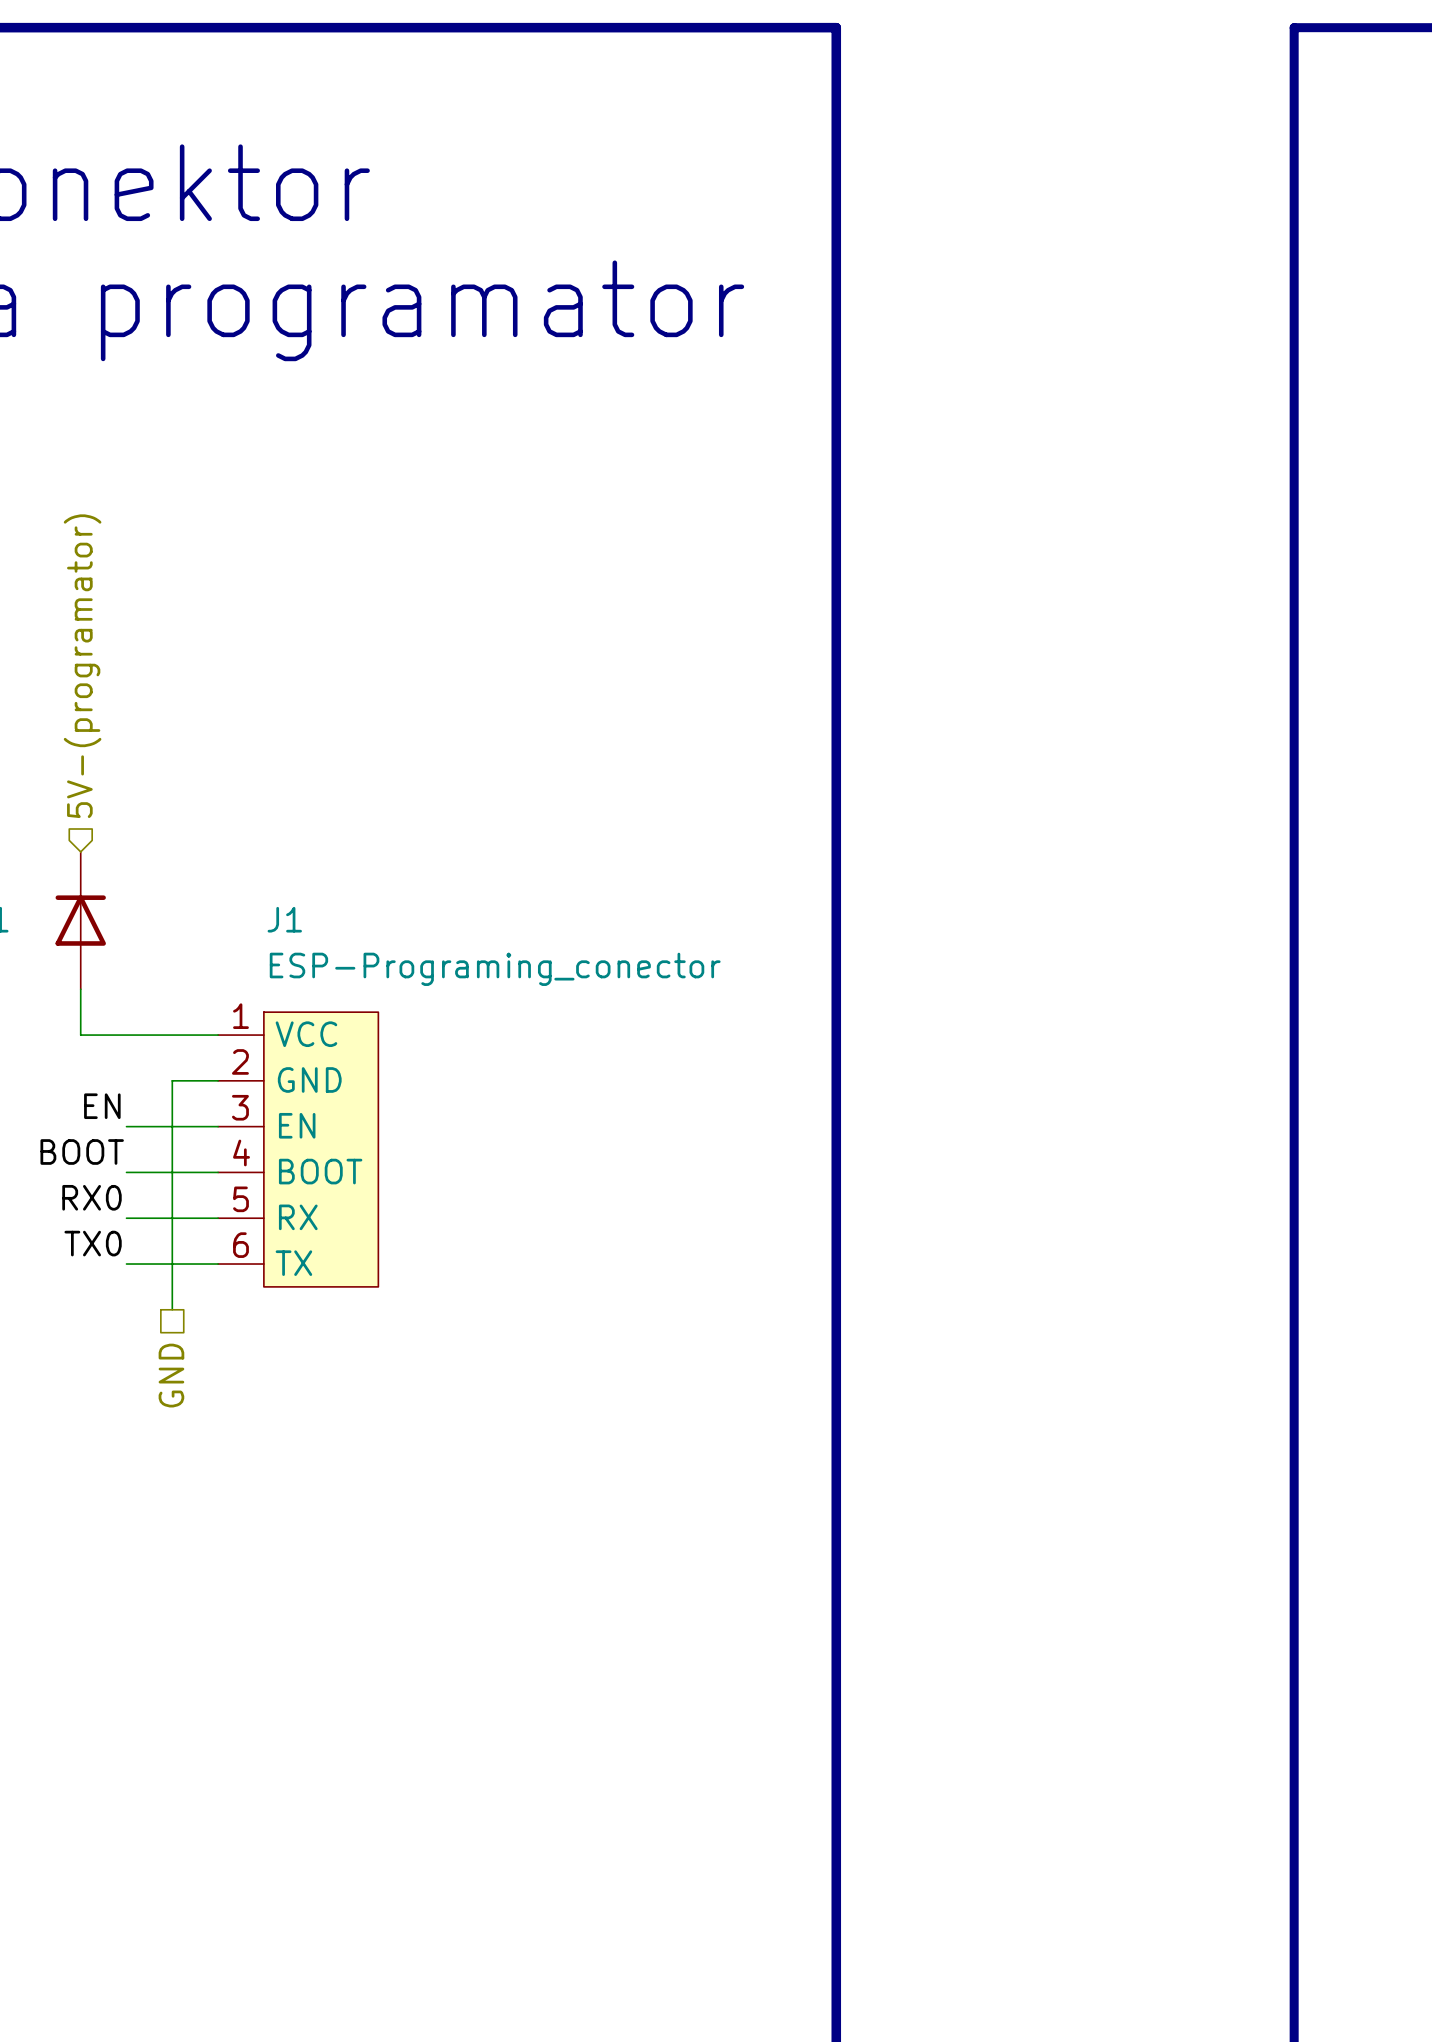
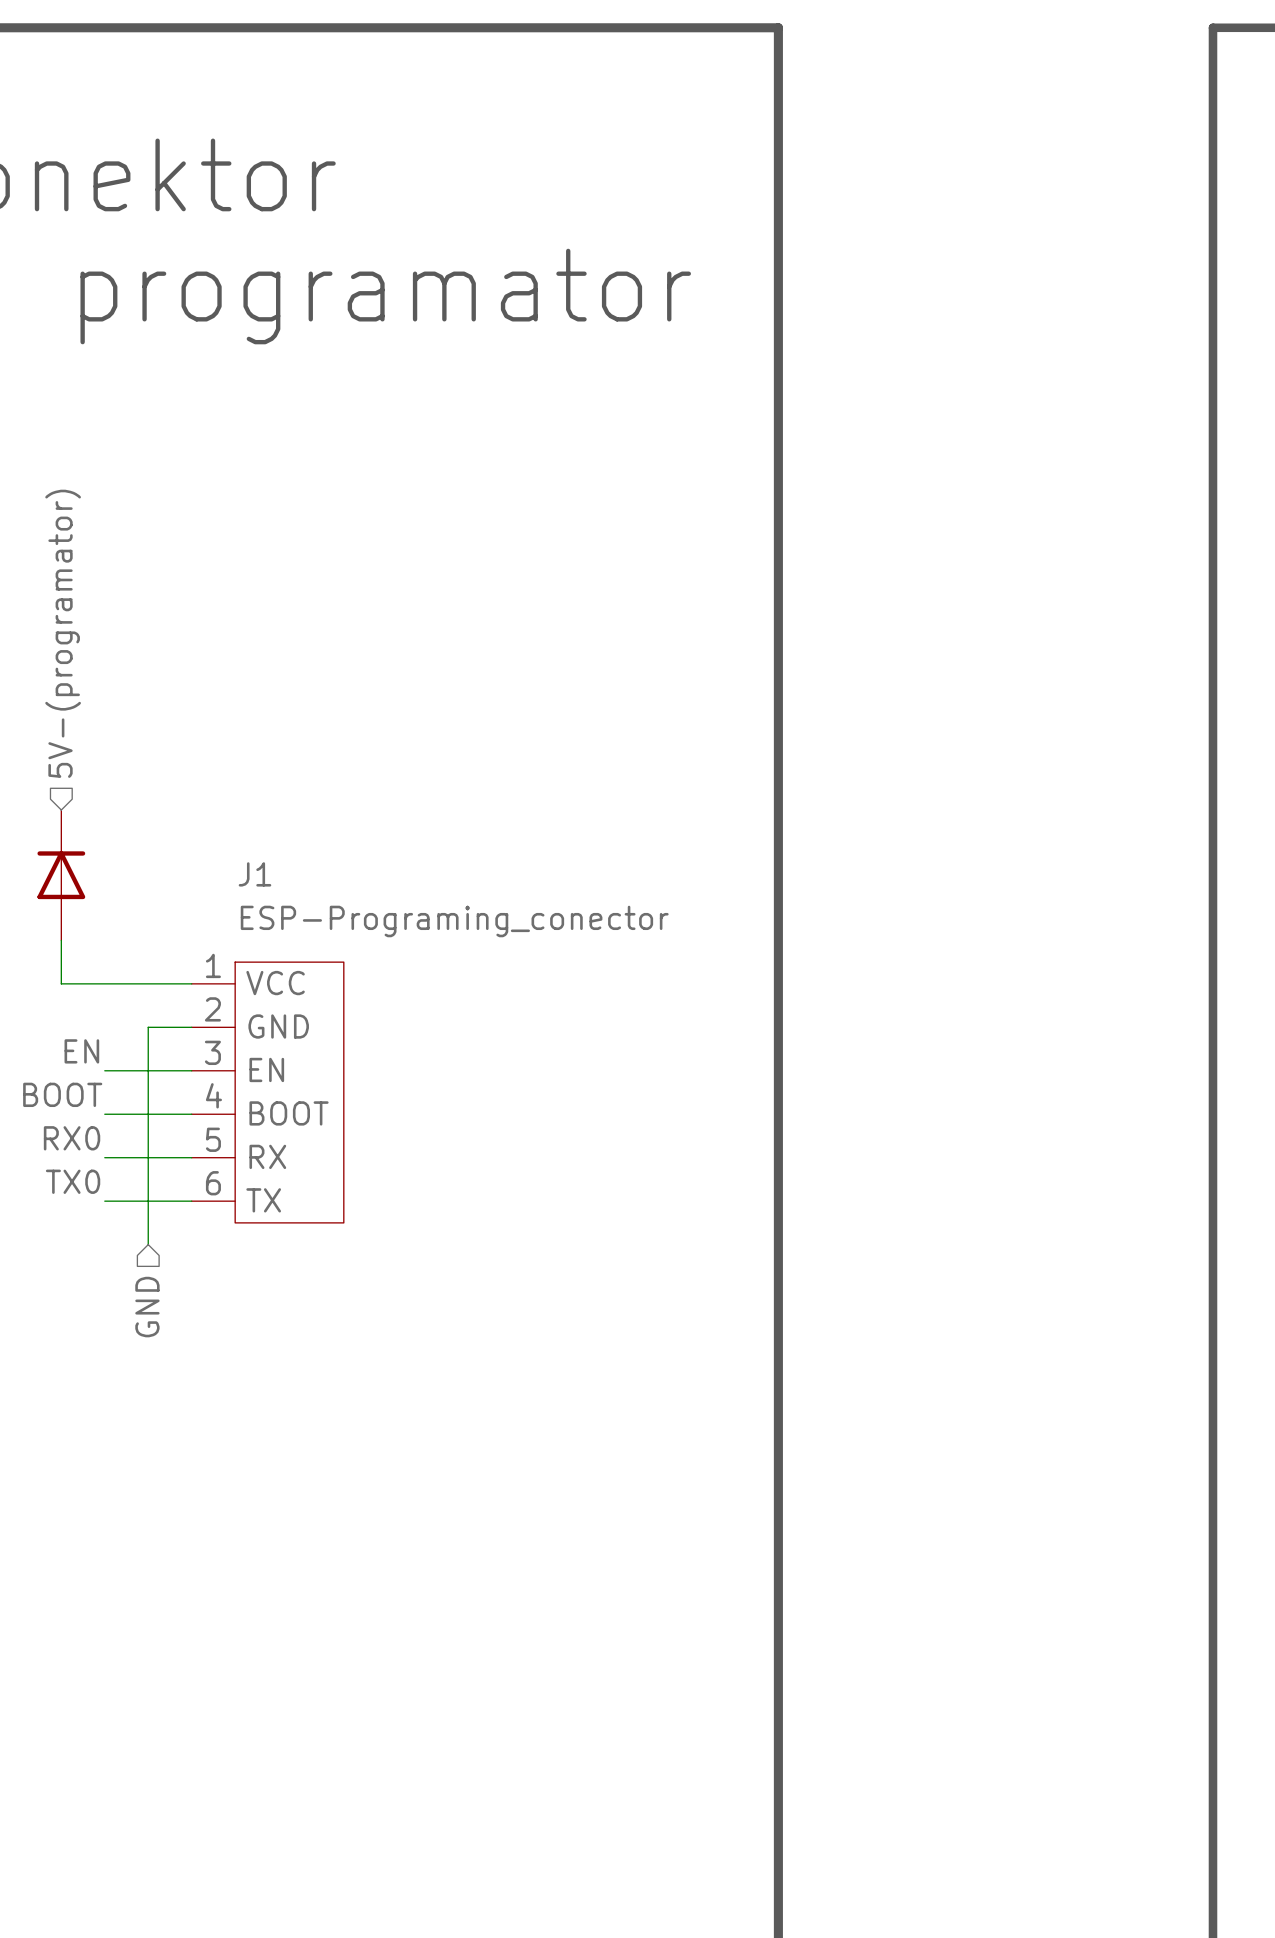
hierarchical label shape: passive (171, 1375) -> input (147, 1307)

